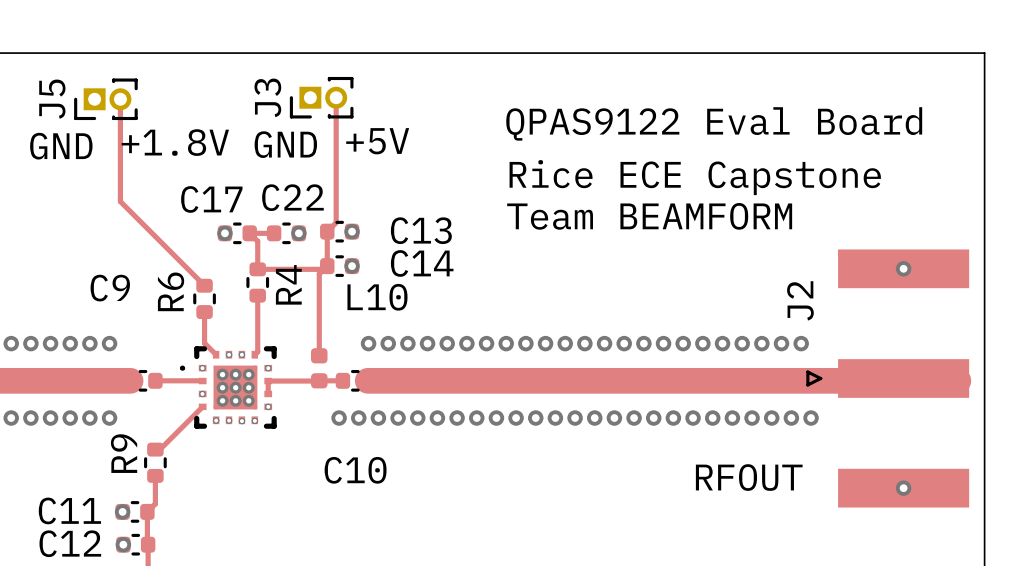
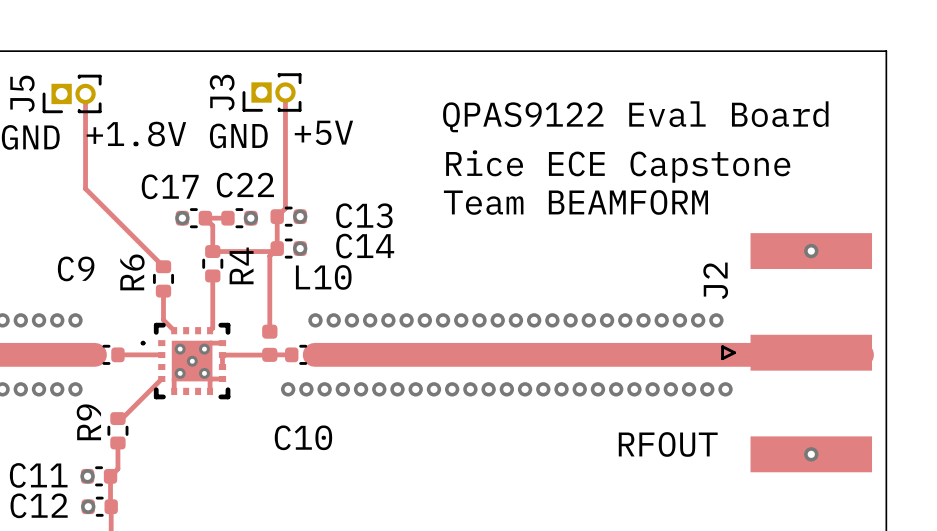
via: (229, 354) -> none
via: (241, 354) -> none
via: (202, 368) -> none
track: none -> (210, 343) (222, 343)
via: (268, 368) -> none
via: (235, 374) -> none
via: (222, 387) -> none
via: (248, 387) -> none
via: (202, 393) -> none
via: (235, 400) -> none
track: none -> (174, 378) (174, 391)
track: none -> (222, 378) (210, 378) (210, 391)
via: (268, 406) -> none
via: (216, 420) -> none
via: (229, 420) -> none
via: (254, 420) -> none
via: (241, 421) -> none

